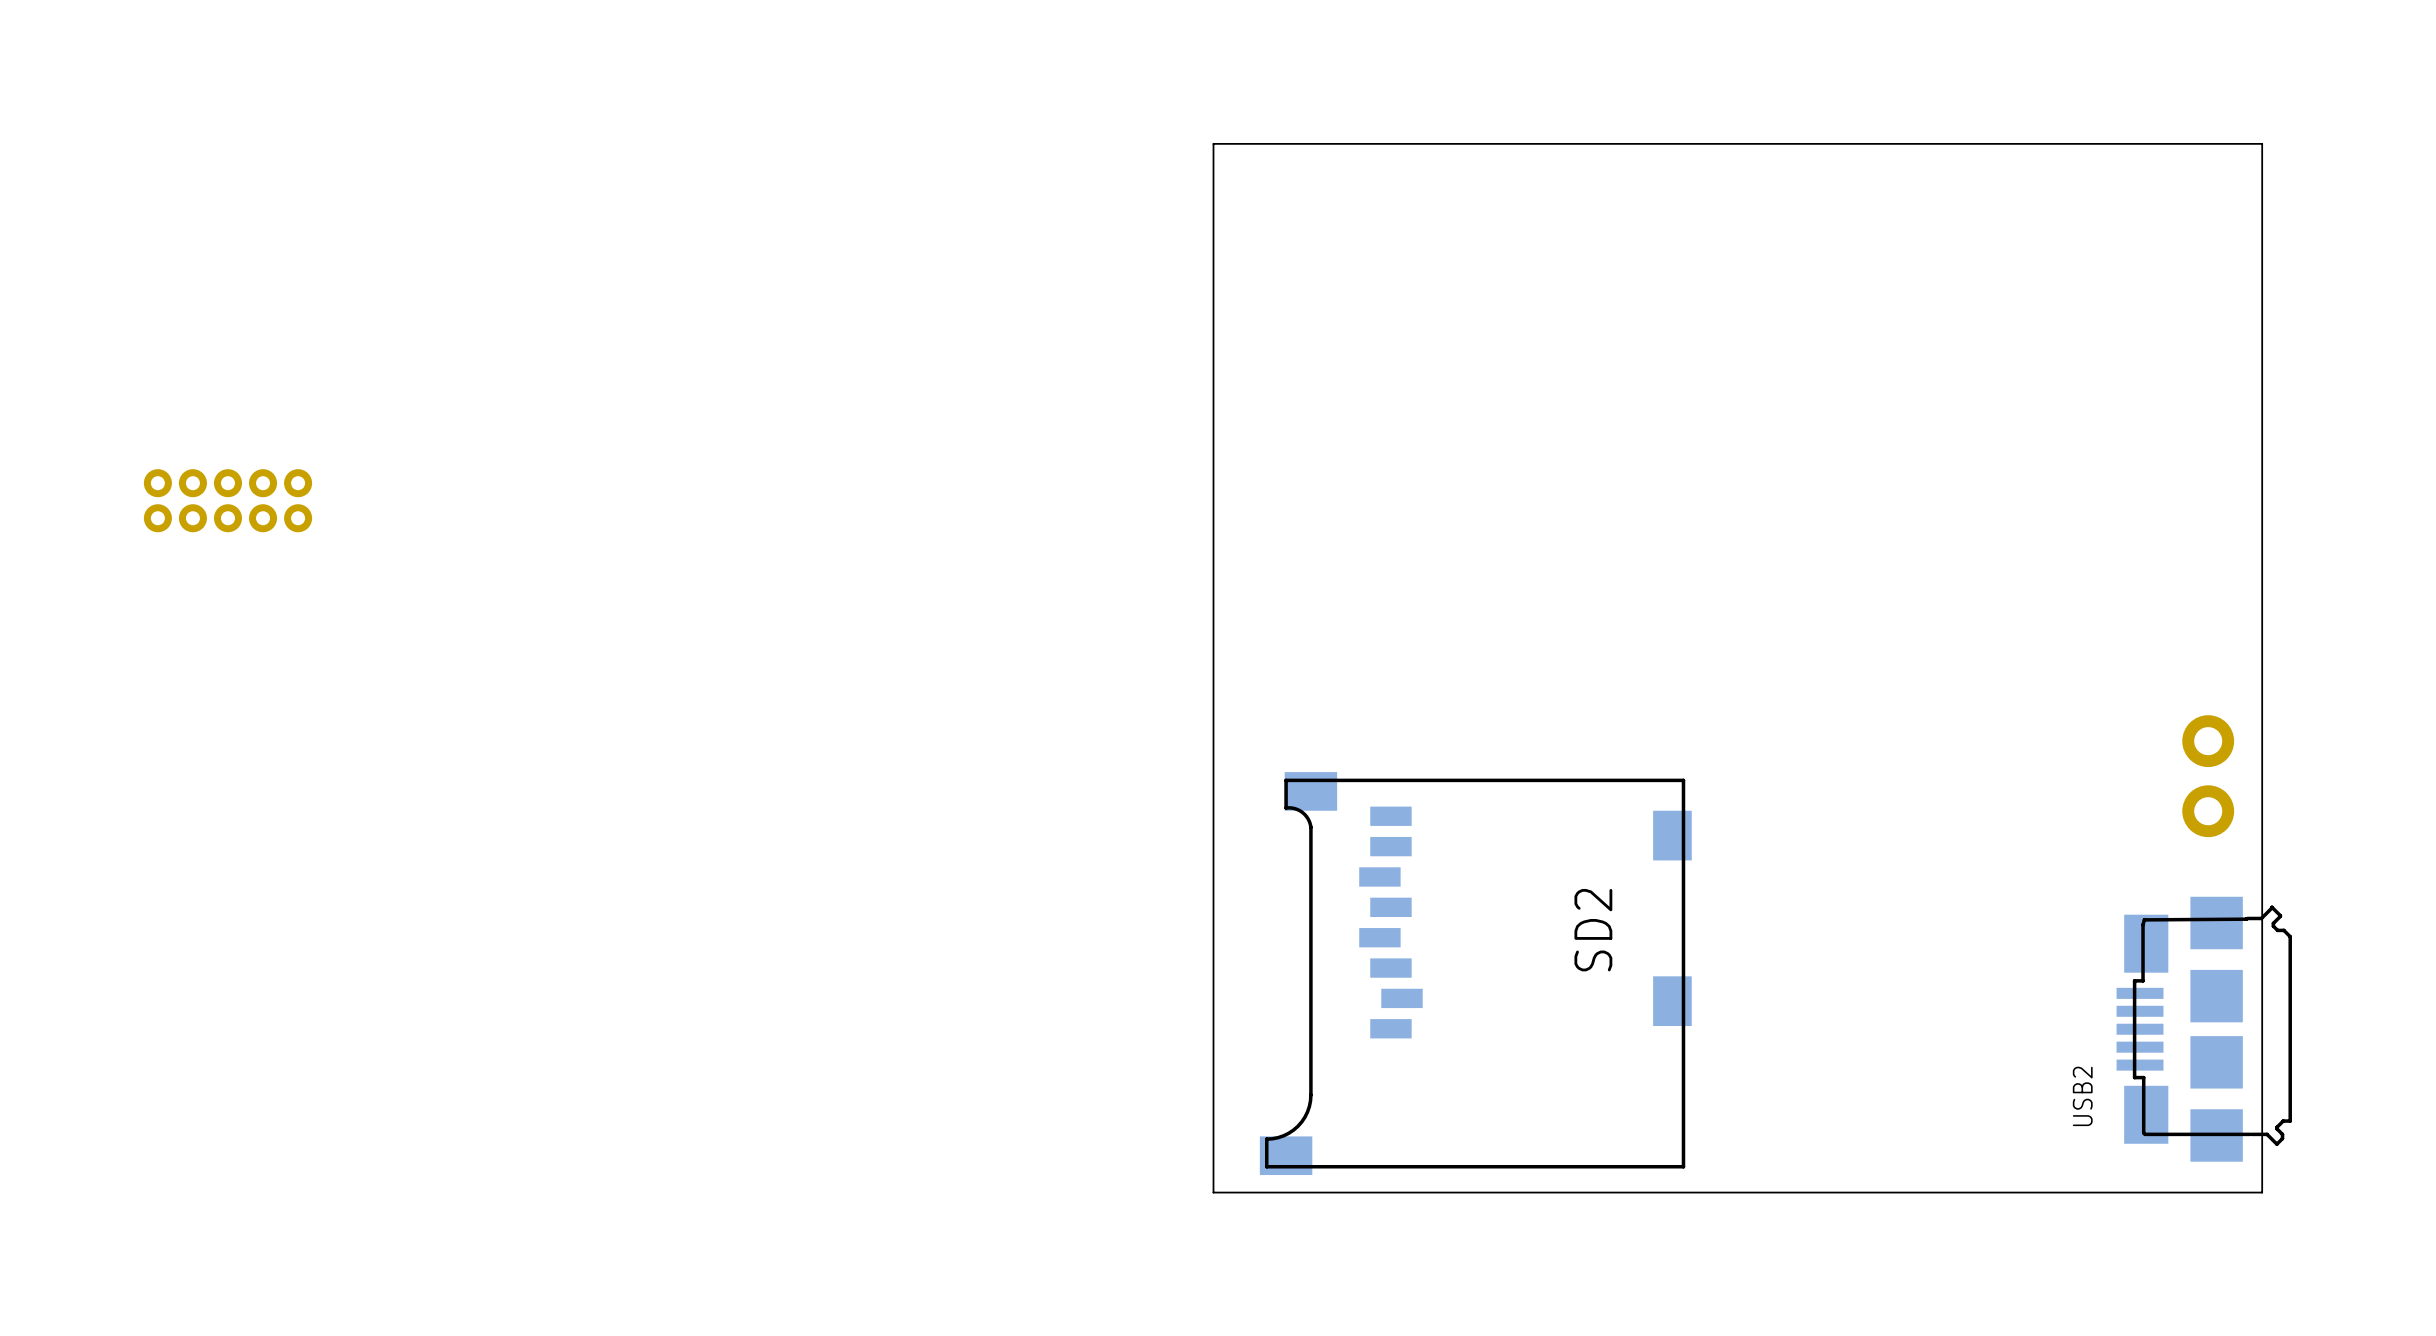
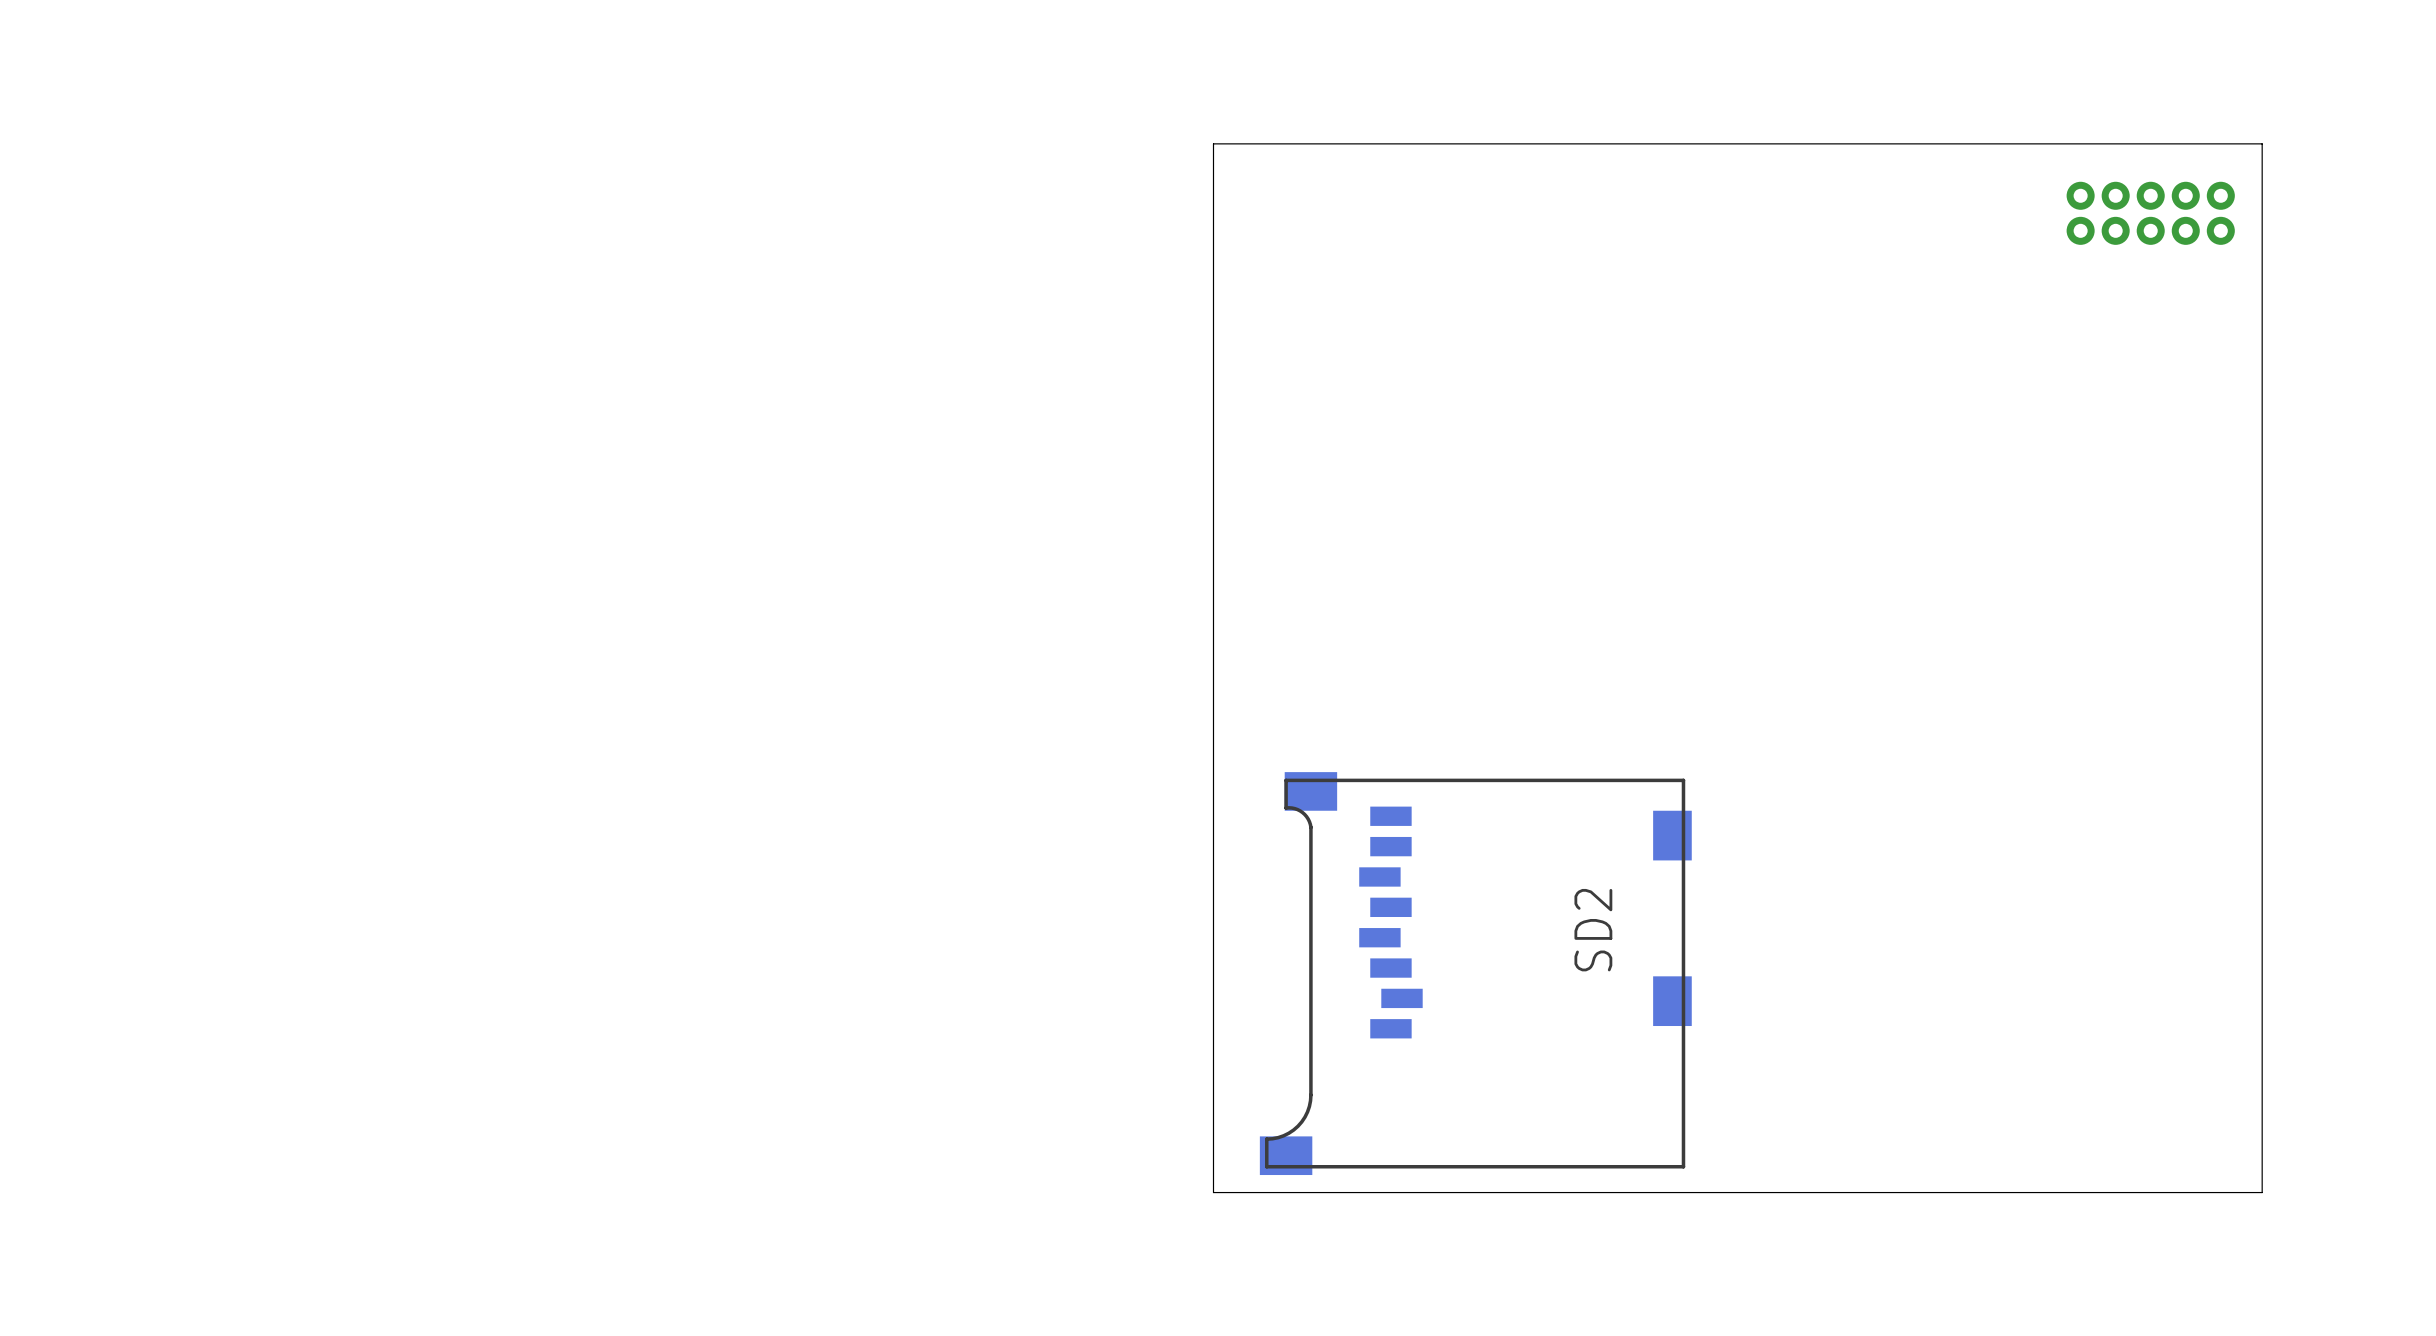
part: none -> (2150, 213)
part: (227, 500) -> none
part: (2208, 776) -> none
USB2: (2204, 1029) -> none

